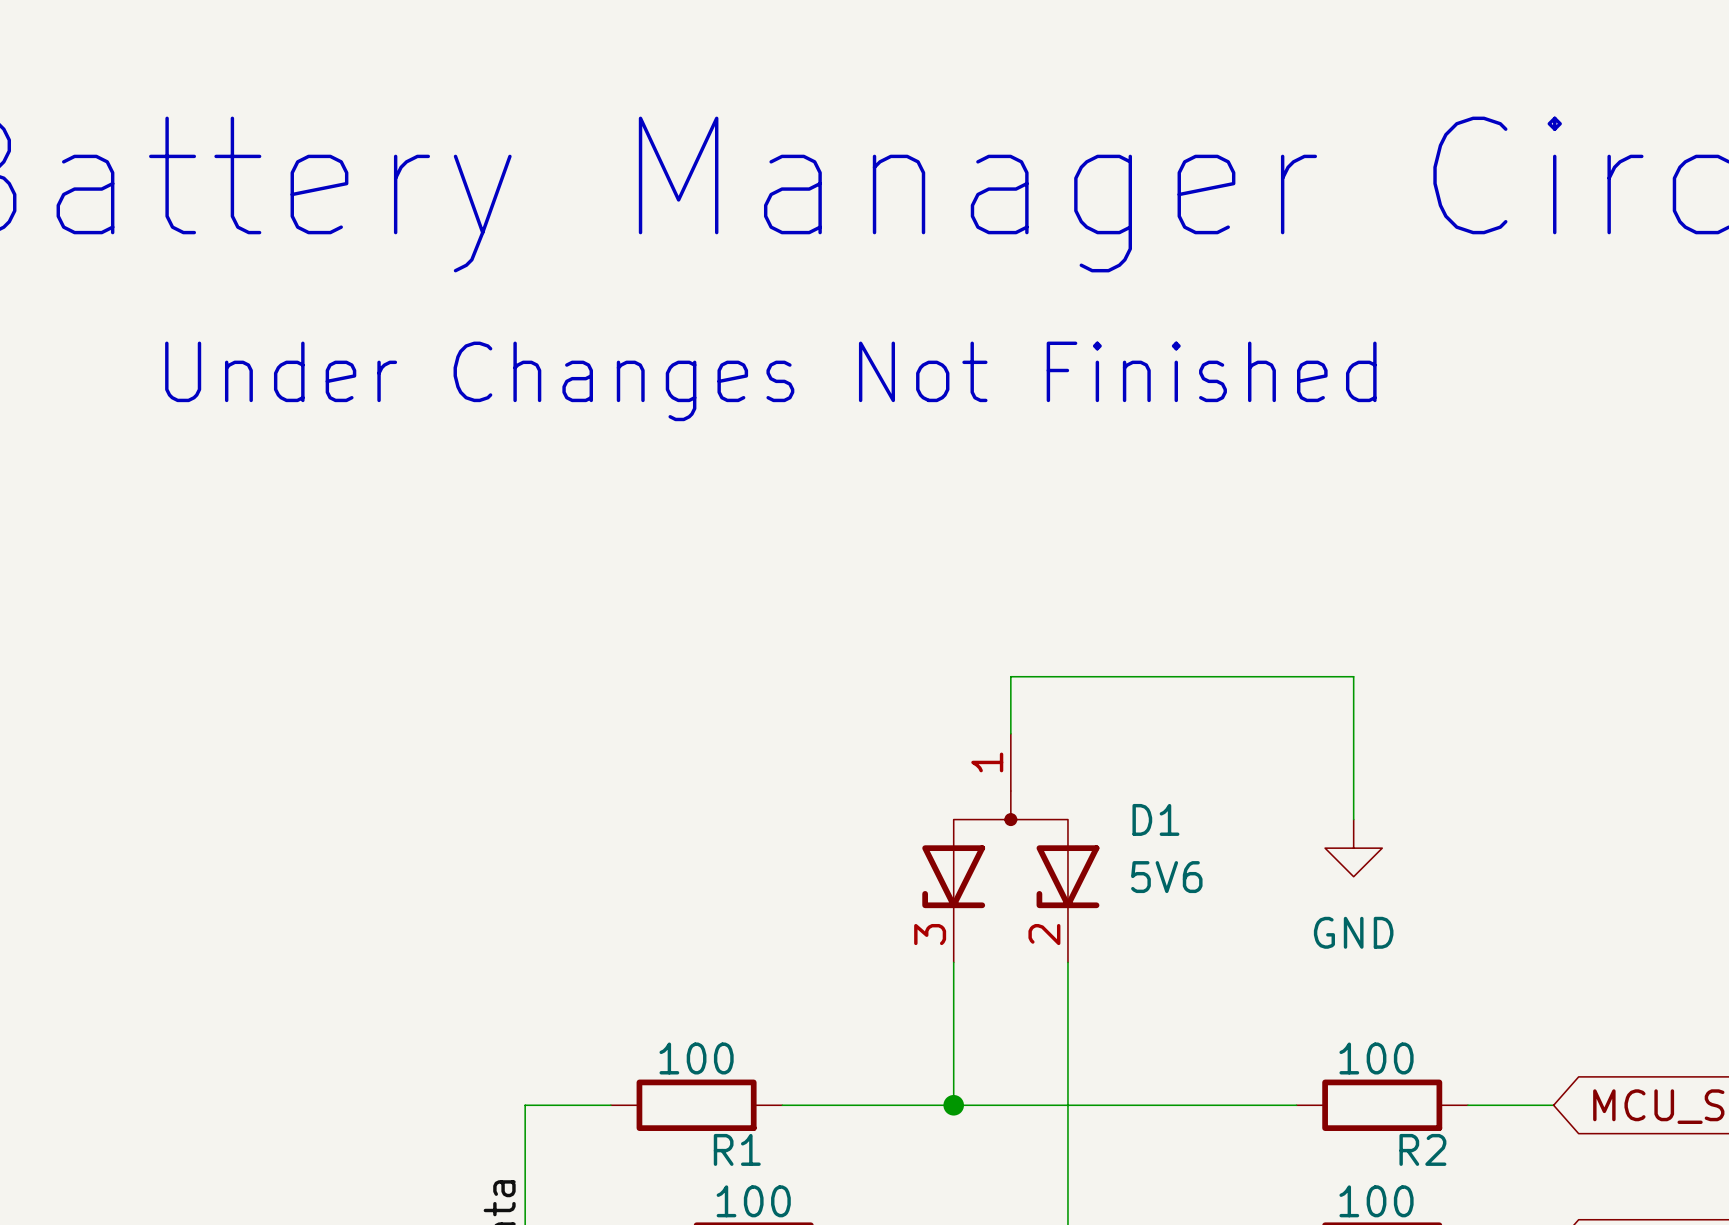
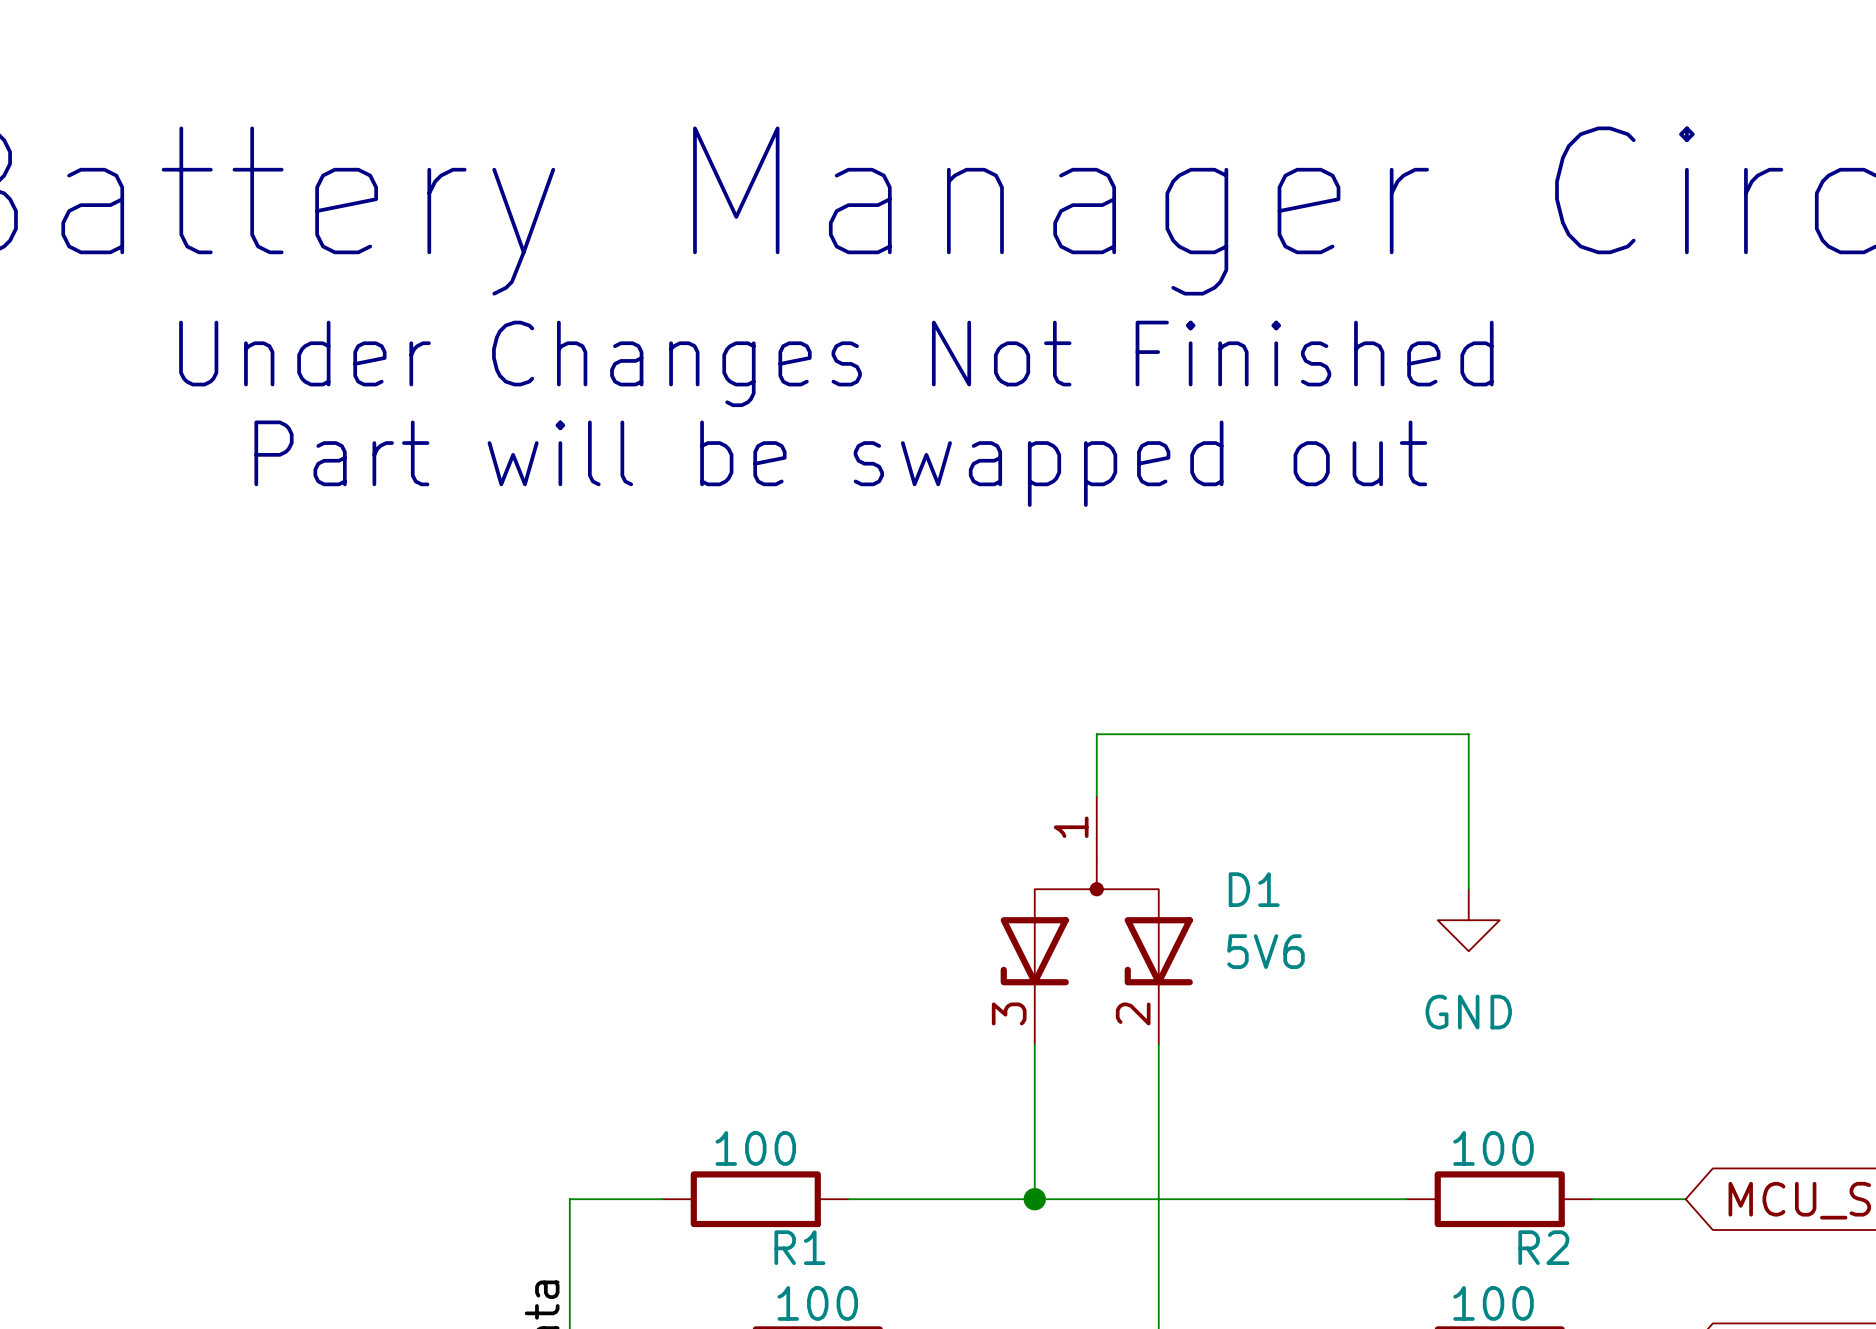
text position: Under Changes Not Finished (770, 381) -> Under Changes Not Finished (836, 363)
text: none -> Part will be swapped out (840, 463)

